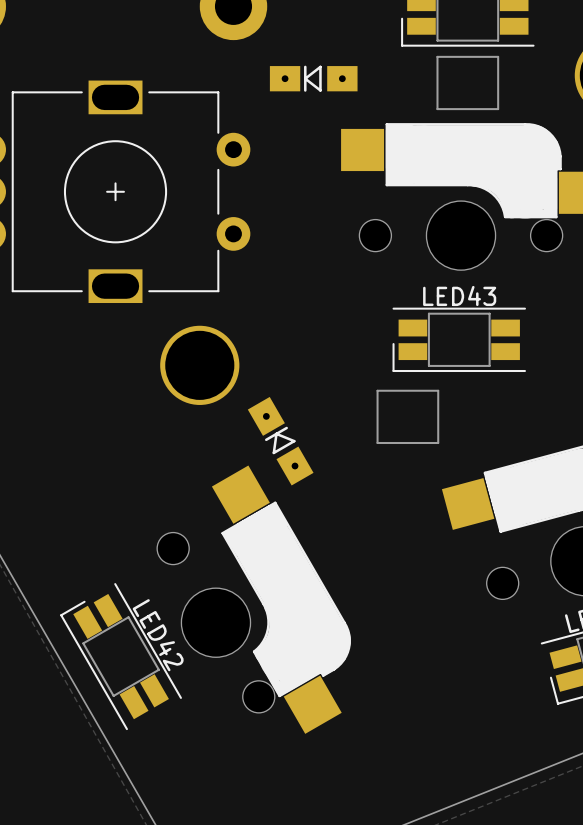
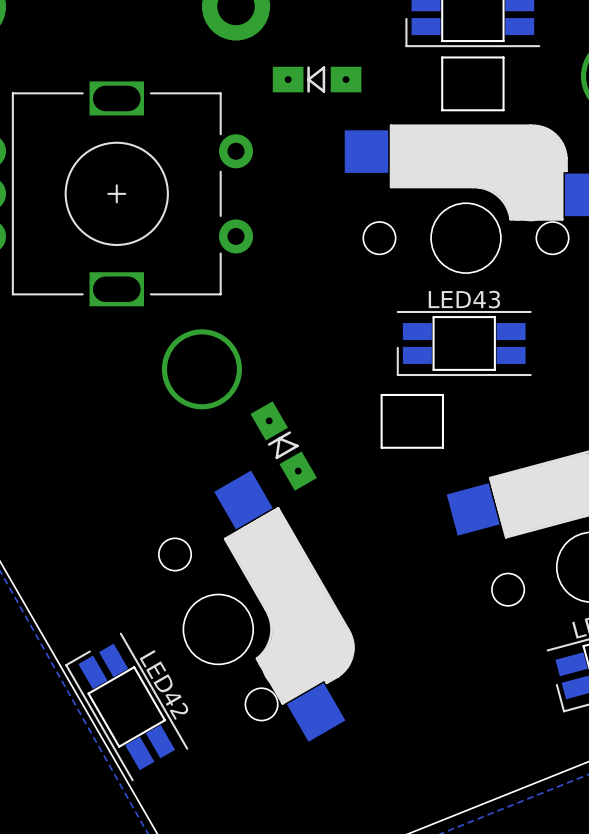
LED42 position: (121, 656) -> (126, 706)

